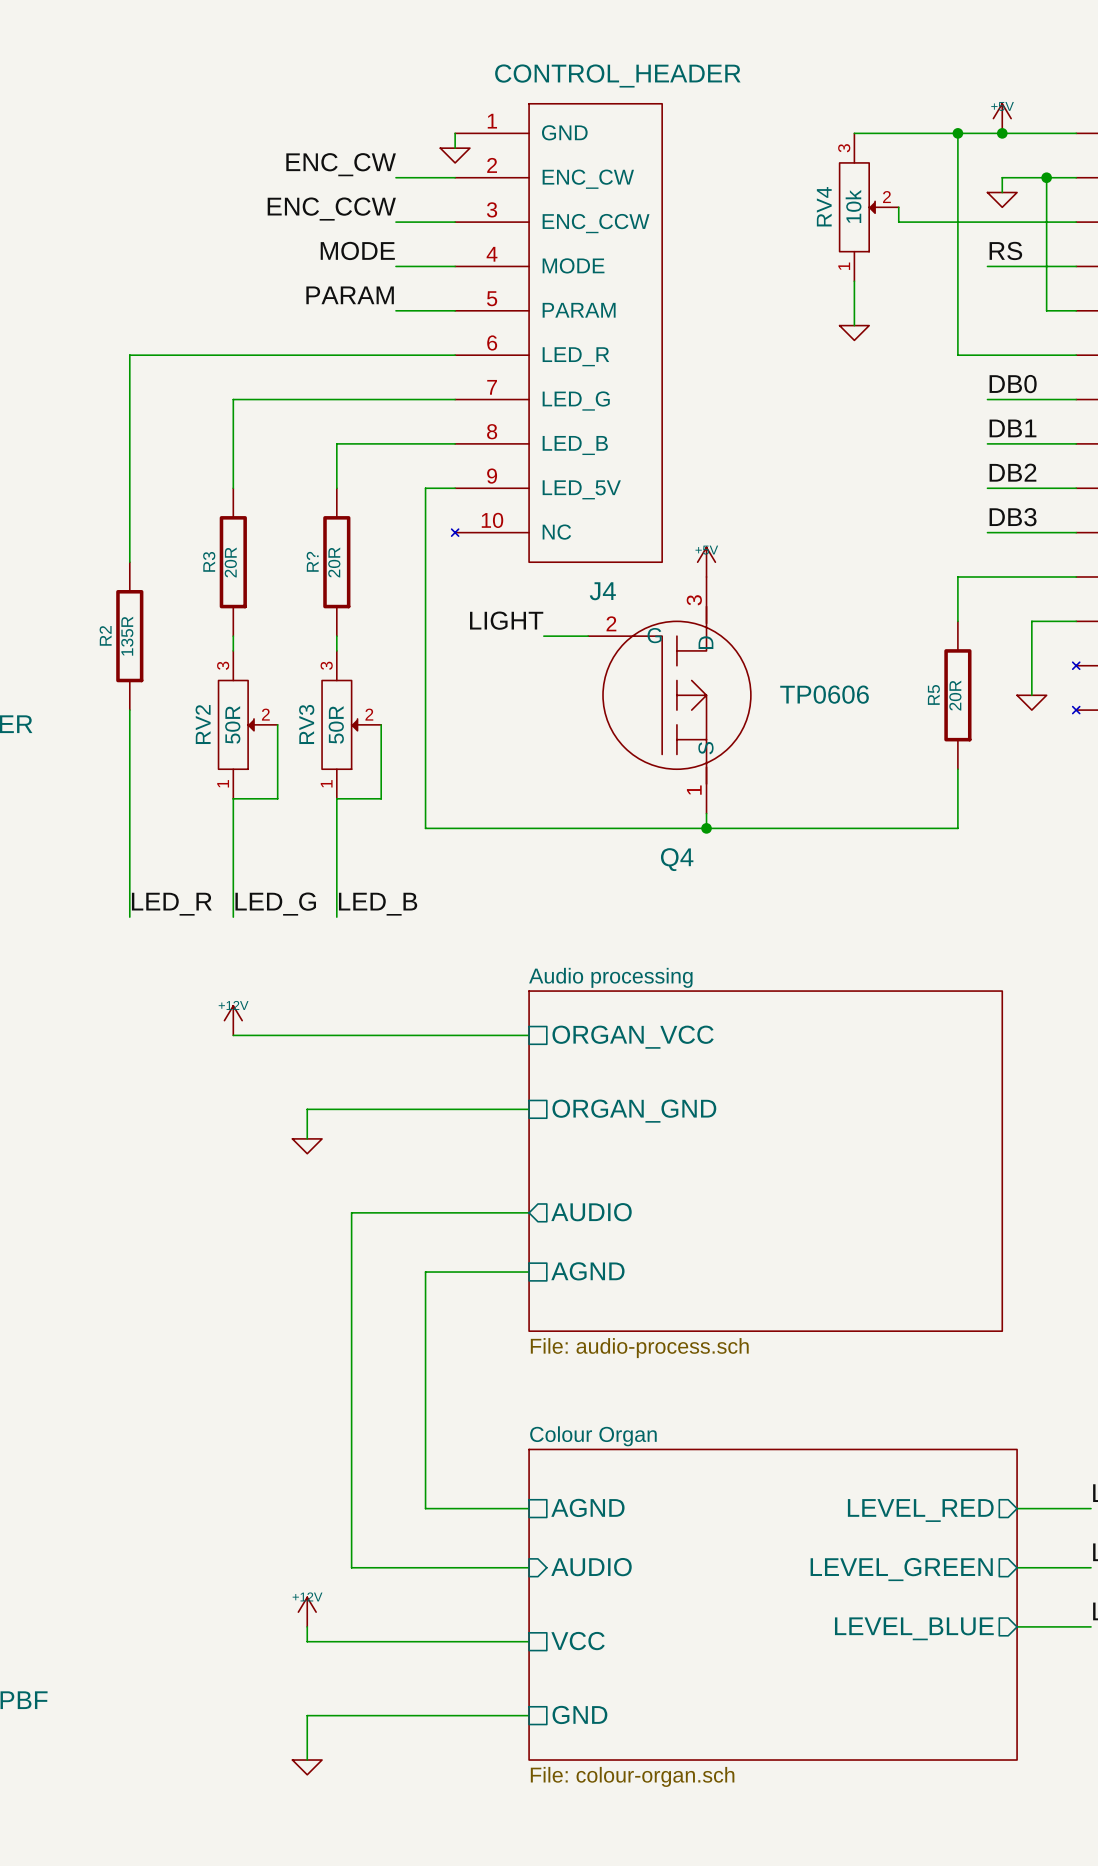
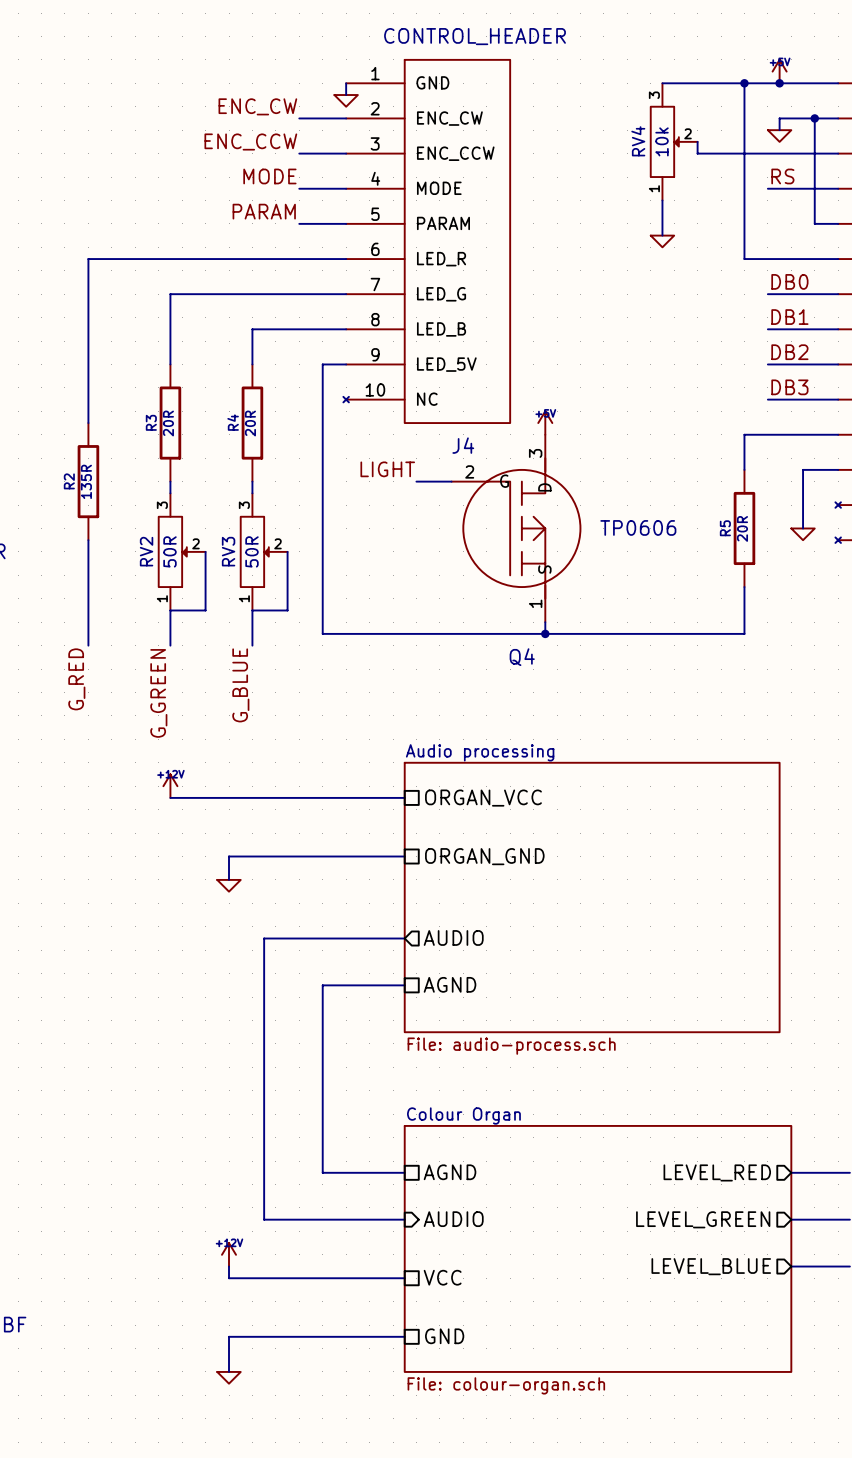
R? name: R? (312, 561) -> R4 (233, 422)
wire: (129, 843) (129, 917) -> none
wire: (233, 843) (233, 917) -> none
wire: (336, 843) (336, 917) -> none
label: none -> G_RED (76, 679)
label: none -> G_BLUE (240, 685)
label: LED_R (171, 904) -> none
label: LED_G (275, 904) -> none
label: LED_B (378, 904) -> none
label: none -> G_GREEN (158, 693)

